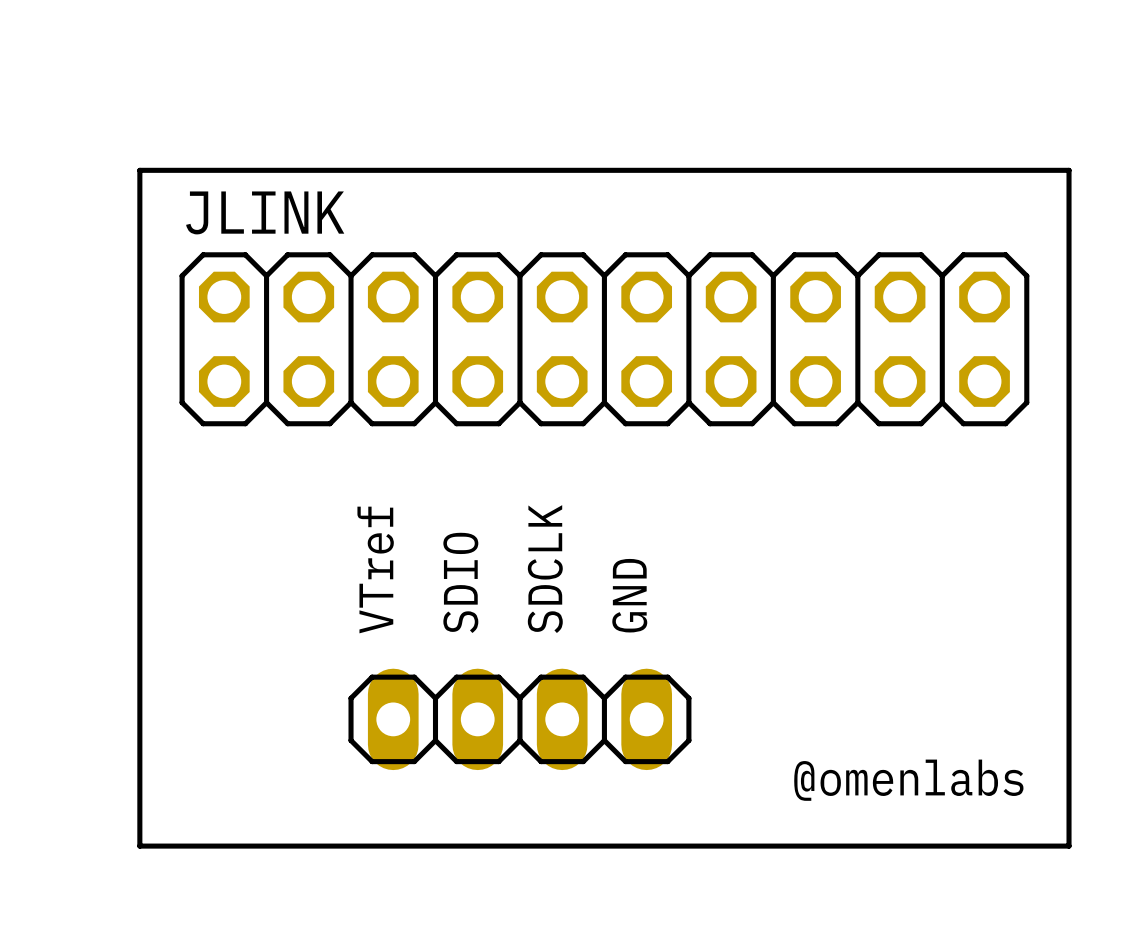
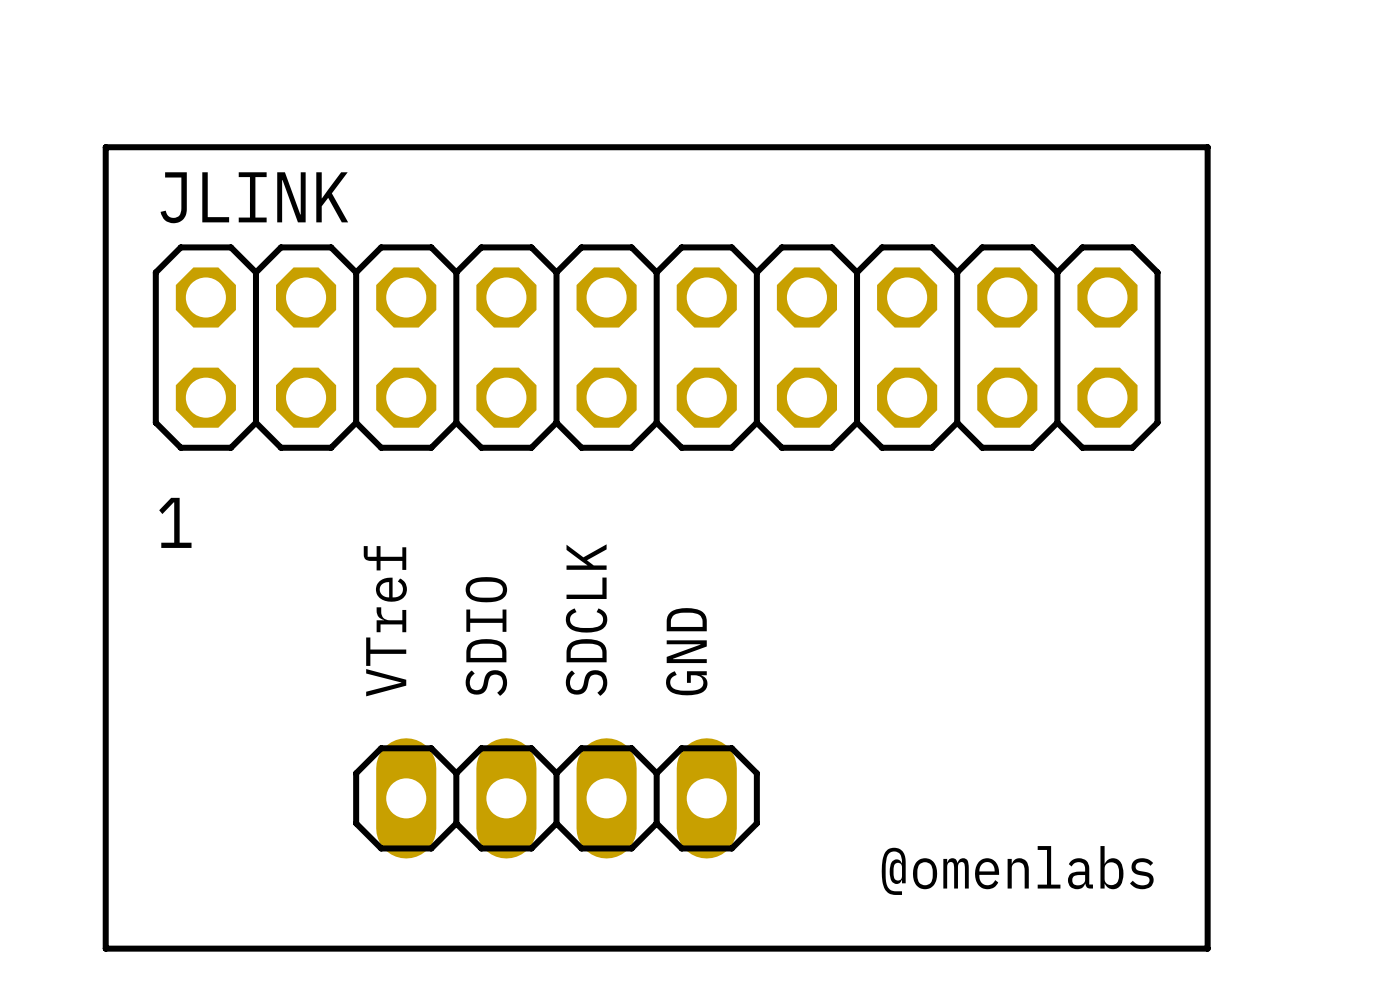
text: none -> 1 (175, 522)

